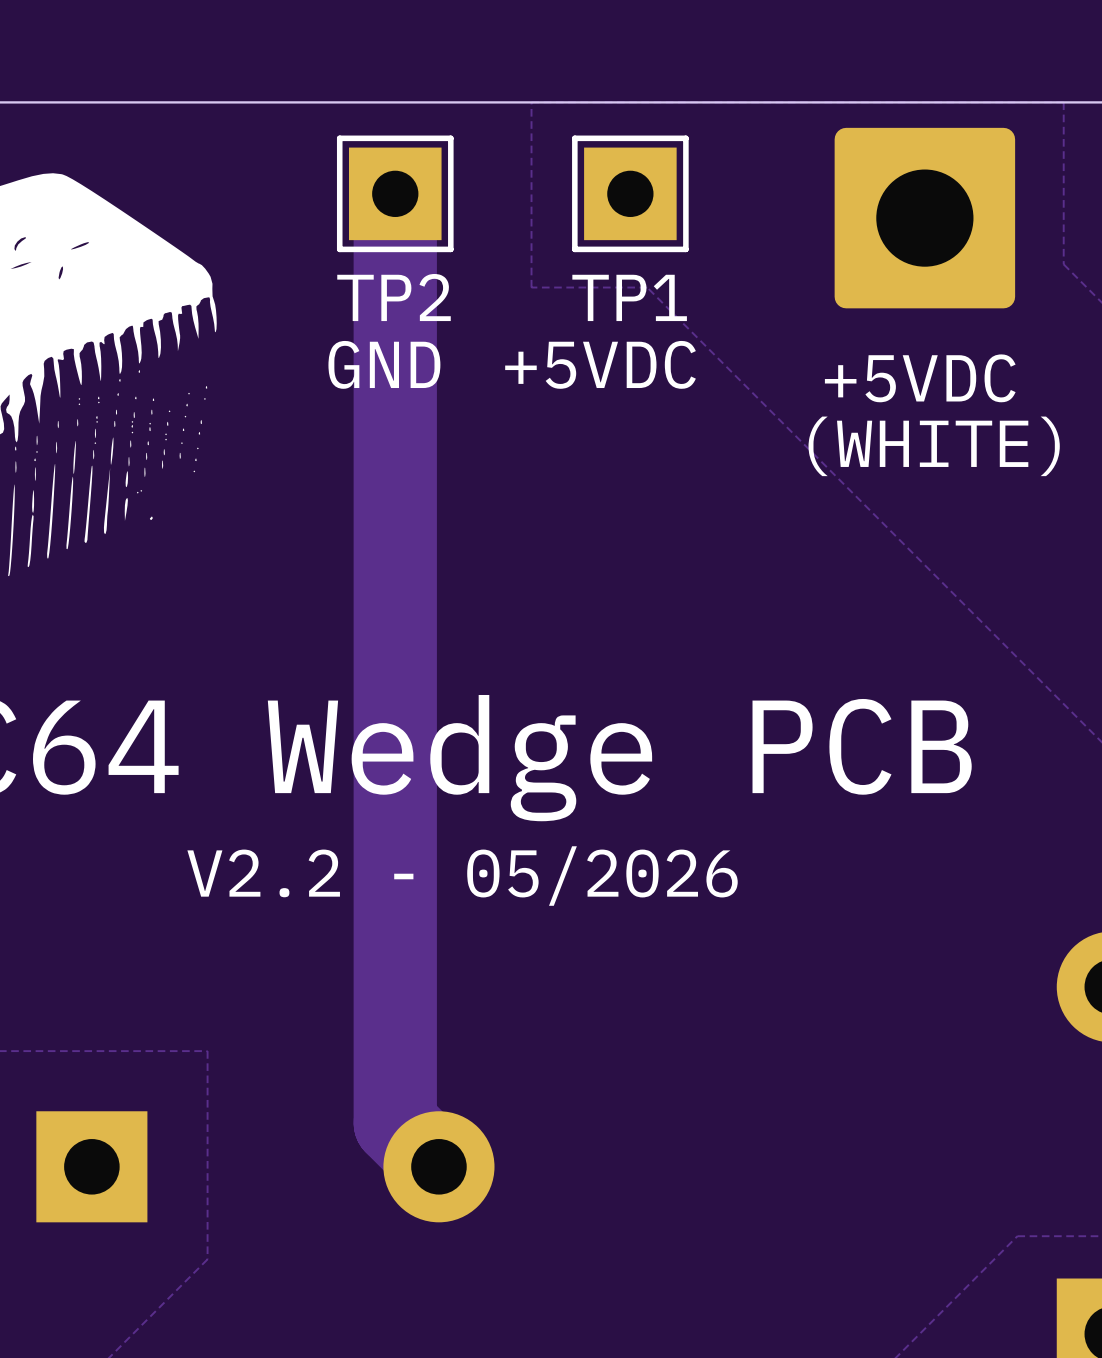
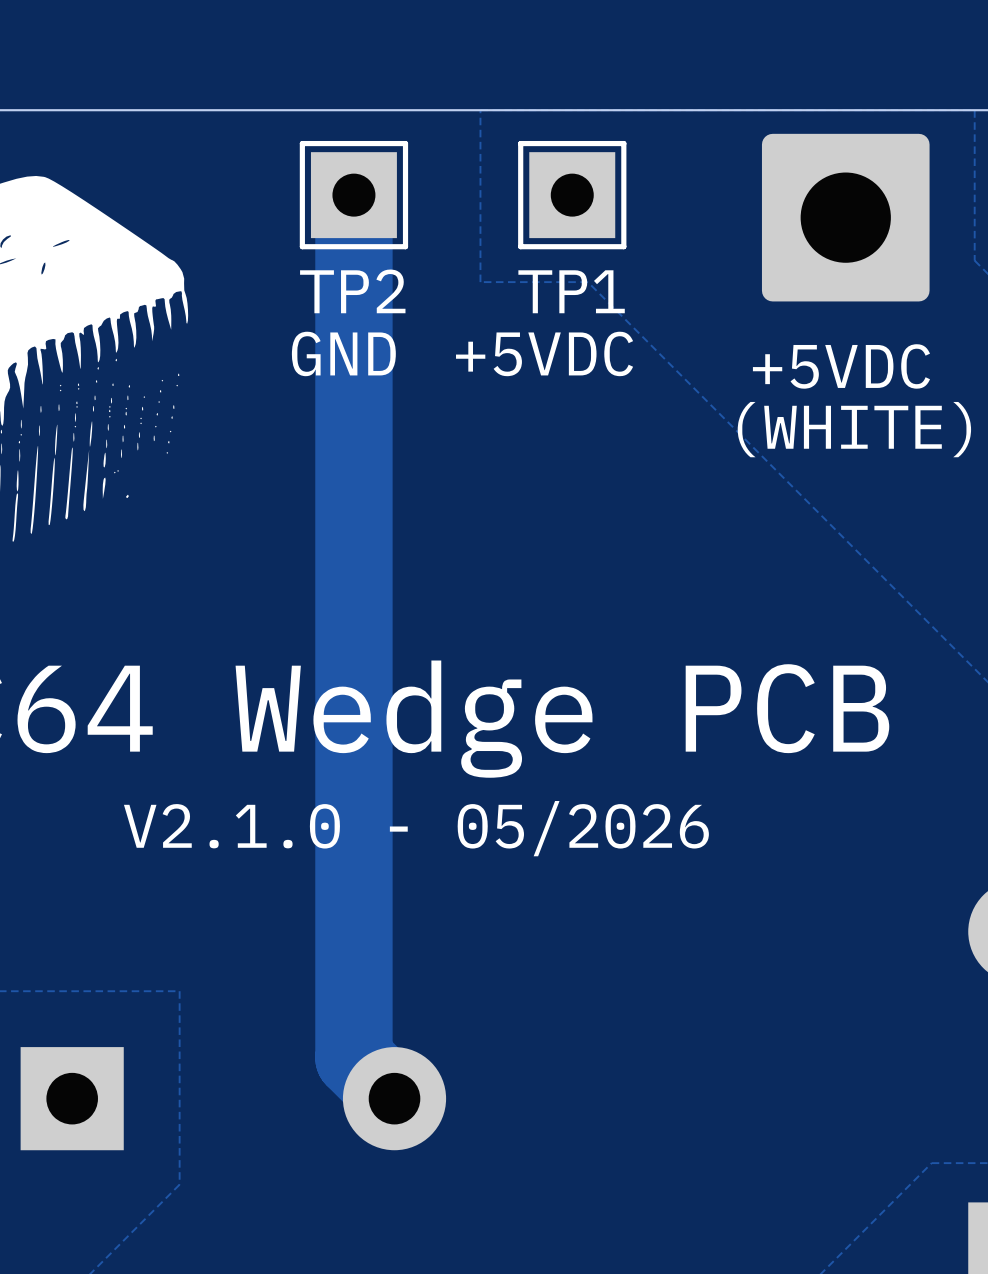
text: V2.2 - 05/2026 (462, 876) -> V2.1.0 - 05/2026 (416, 828)

